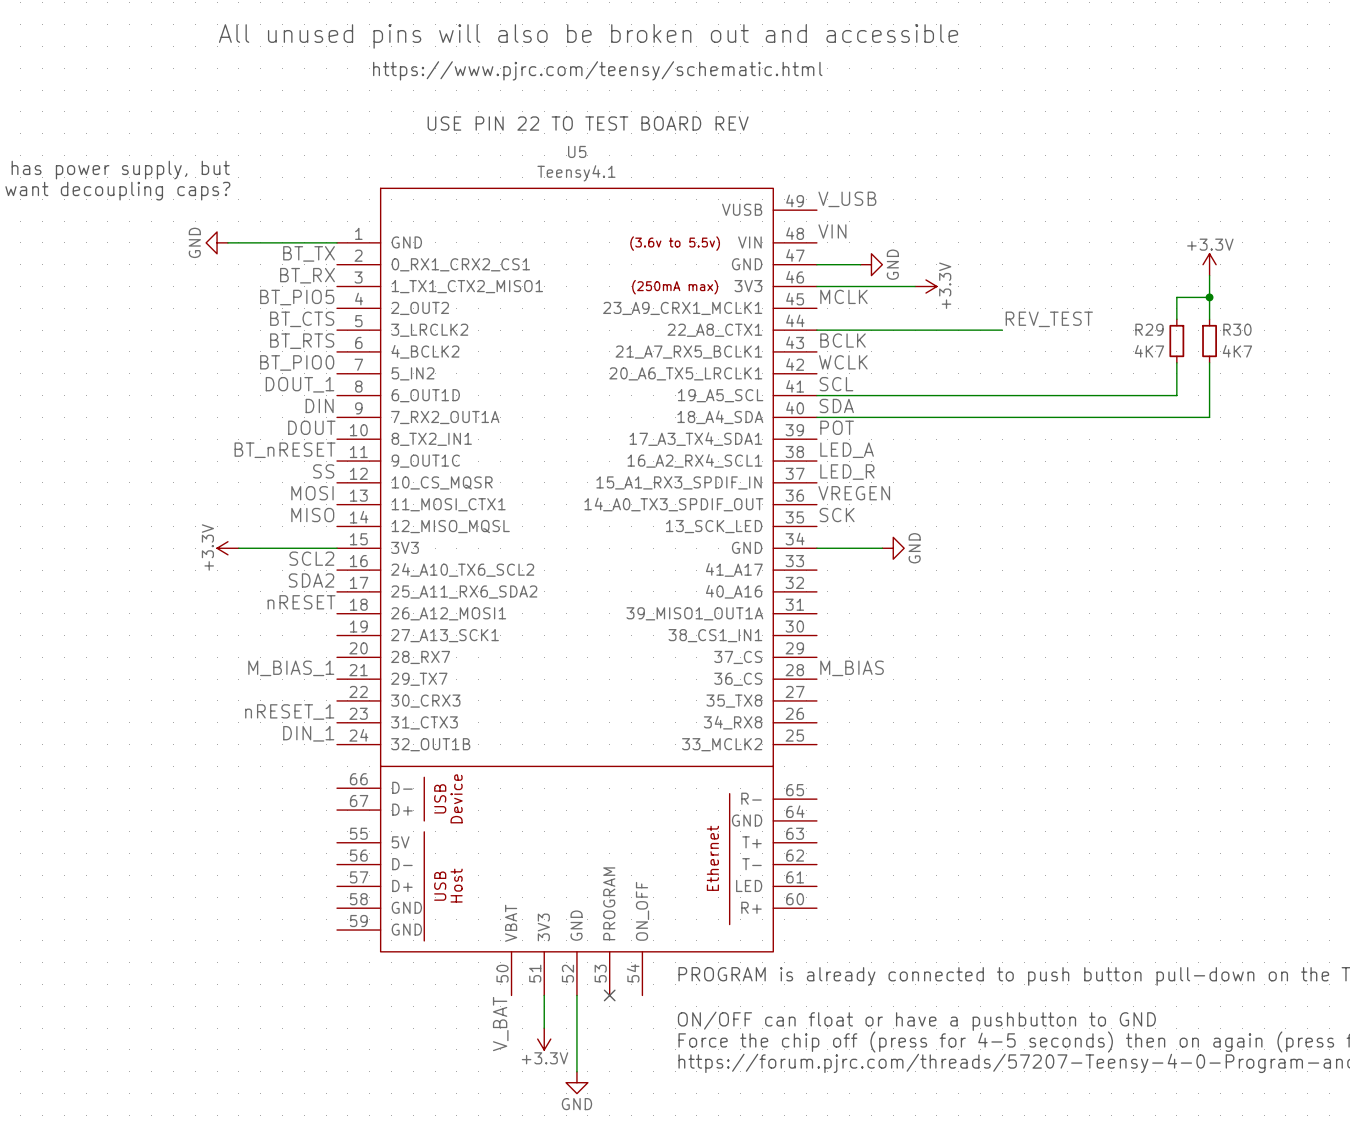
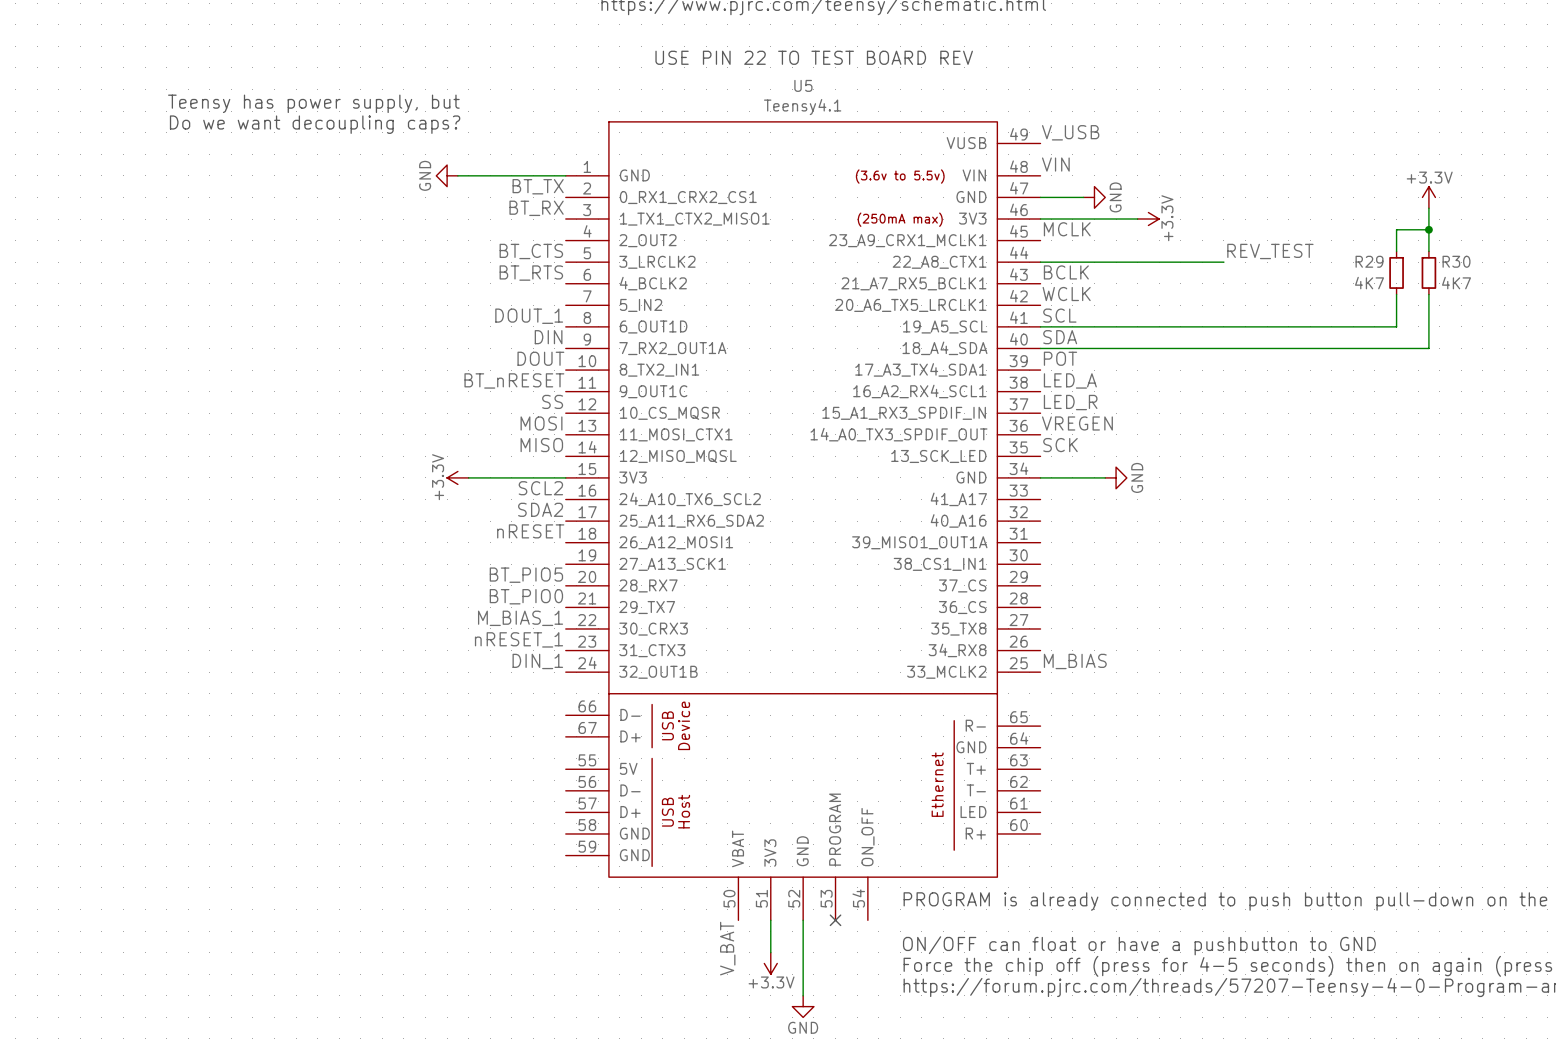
label: BT_PIO5 (297, 297) -> none
label: BT_PIO0 (297, 362) -> none
label: none -> BT_PIO5 (526, 575)
label: M_BIAS_1 (291, 668) -> BT_PIO0 (526, 596)
label position: M_BIAS (852, 668) -> M_BIAS (1075, 661)
label: none -> M_BIAS_1 (520, 618)

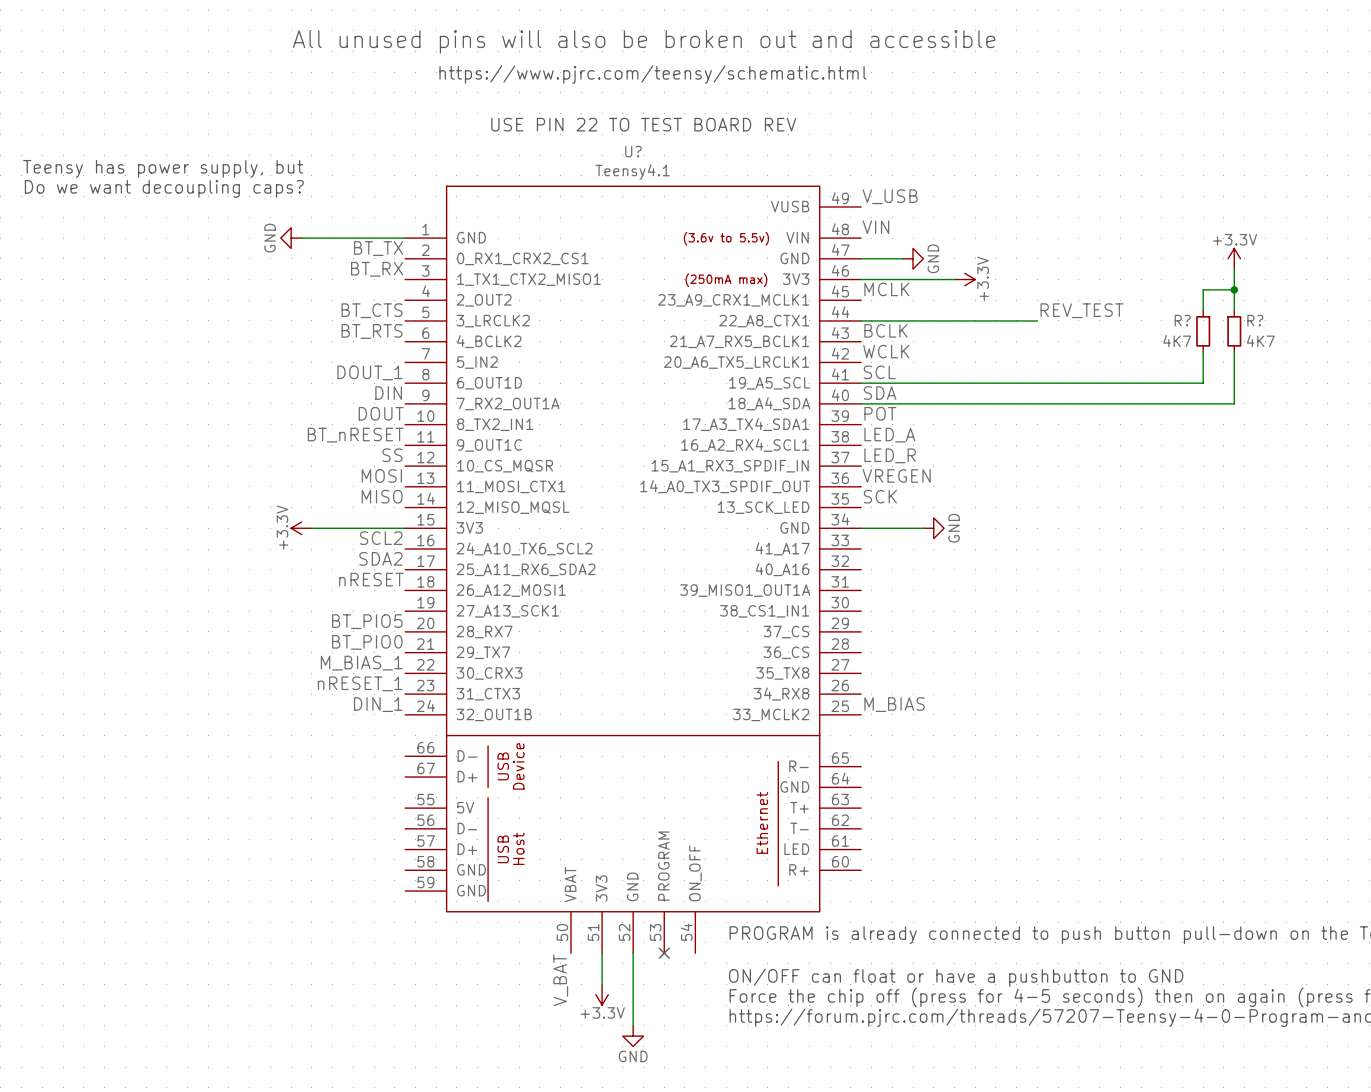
U5 name: U5 (803, 85) -> U? (633, 151)
R29 name: R29 (1369, 261) -> R? (1182, 320)
R30 name: R30 (1456, 261) -> R? (1255, 320)

